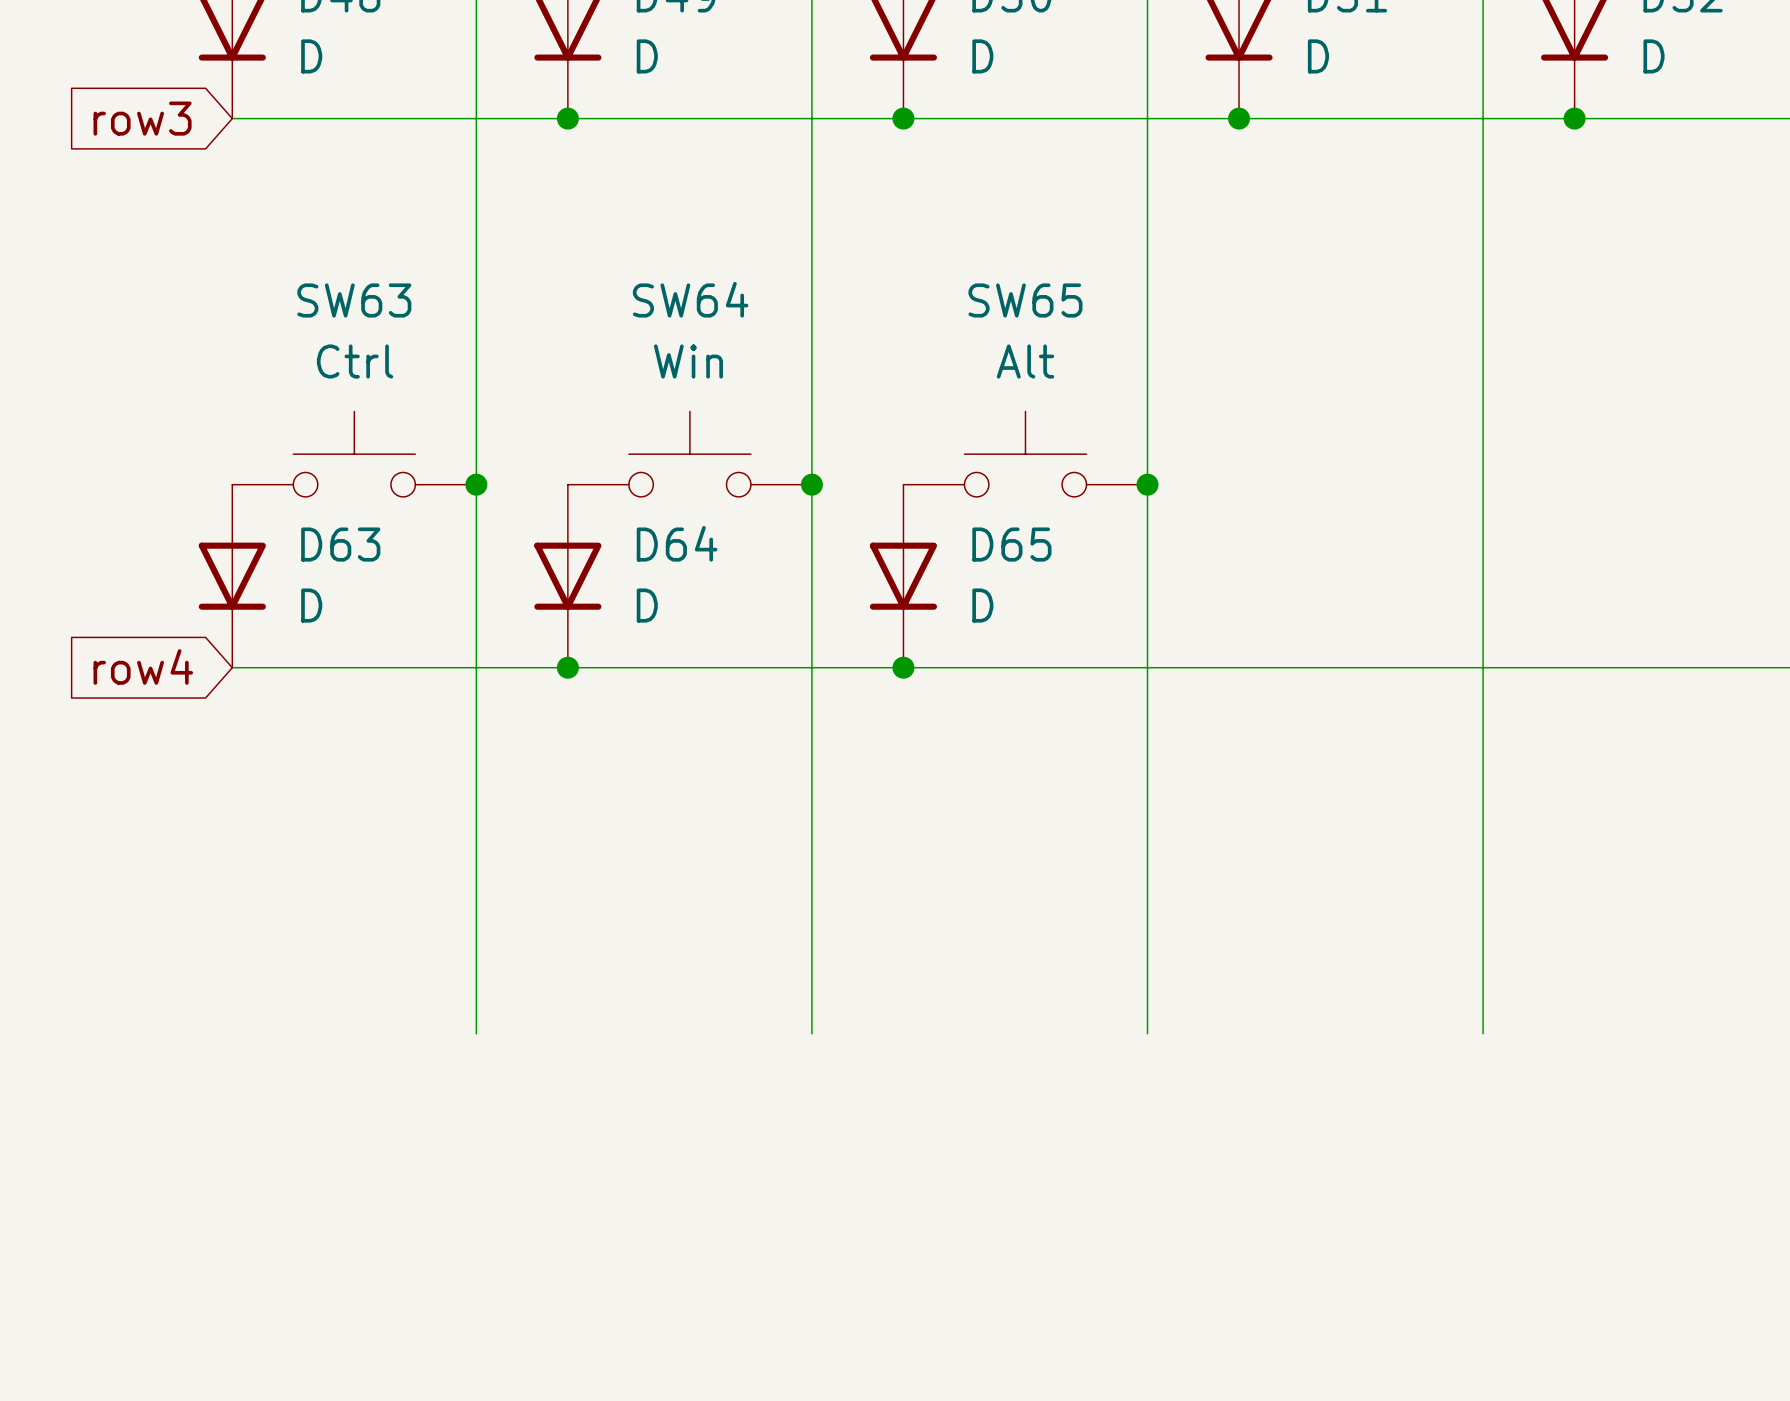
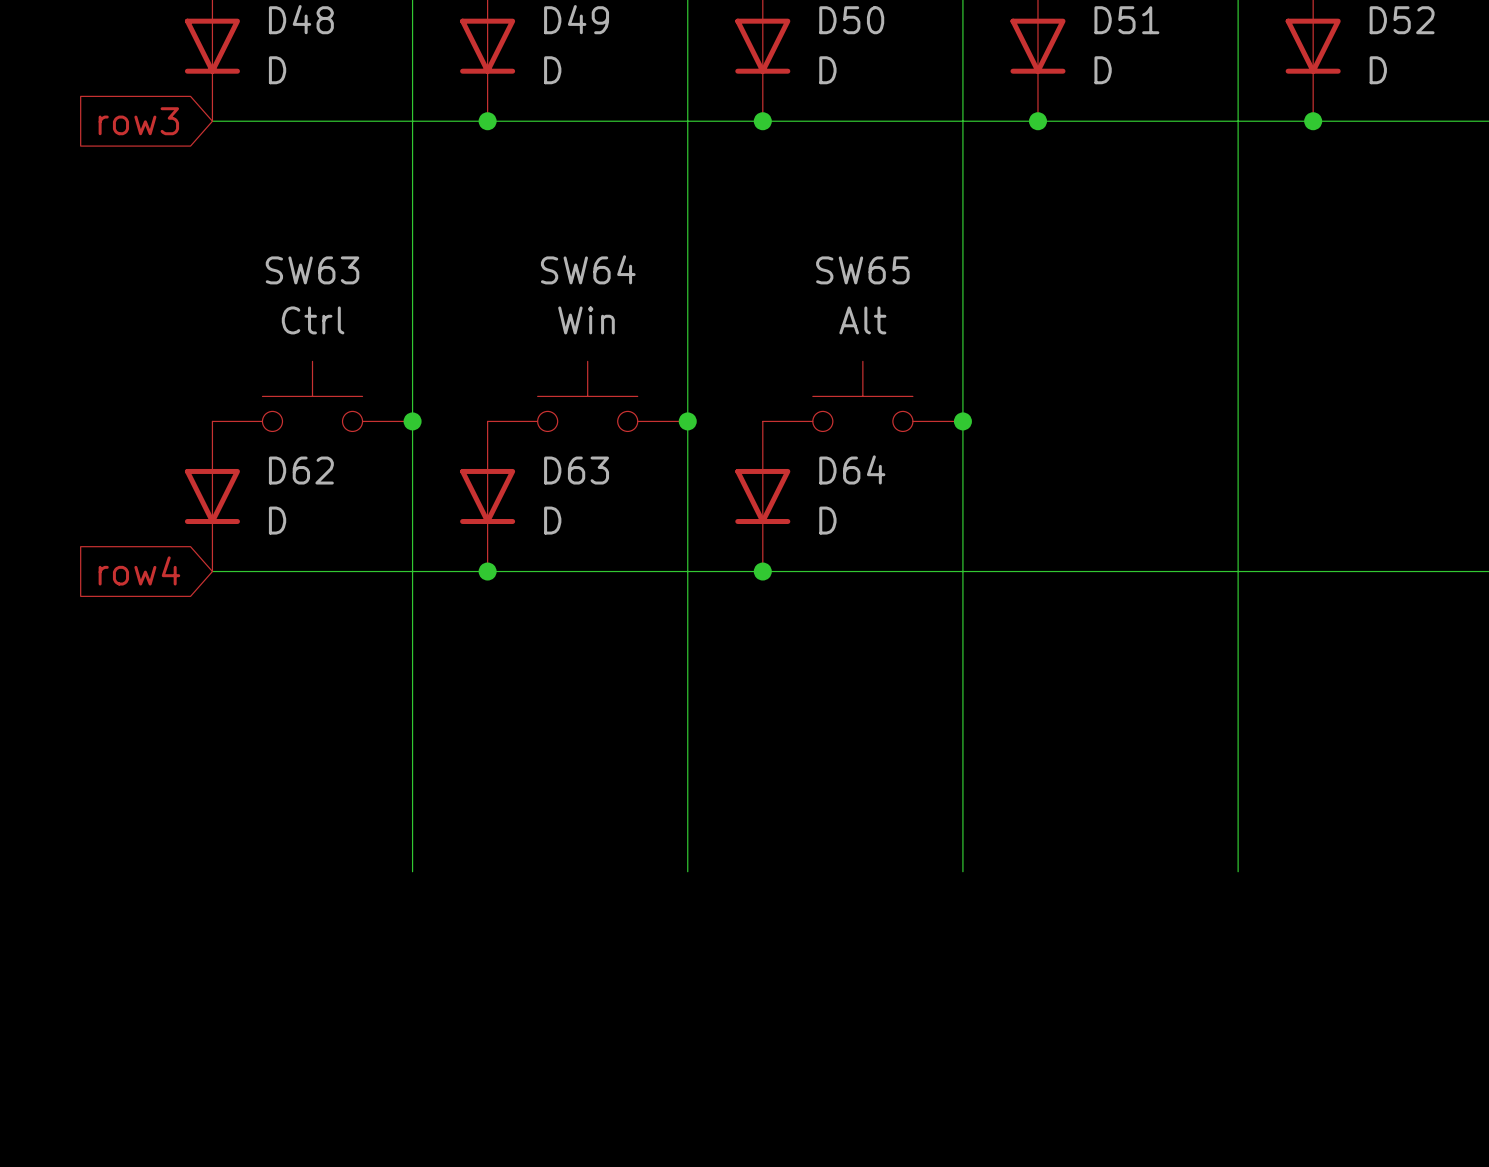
D64 name: D64 (677, 543) -> D63 (576, 470)
D63 name: D63 (340, 544) -> D62 (301, 470)
D65 name: D65 (1011, 544) -> D64 (852, 469)

